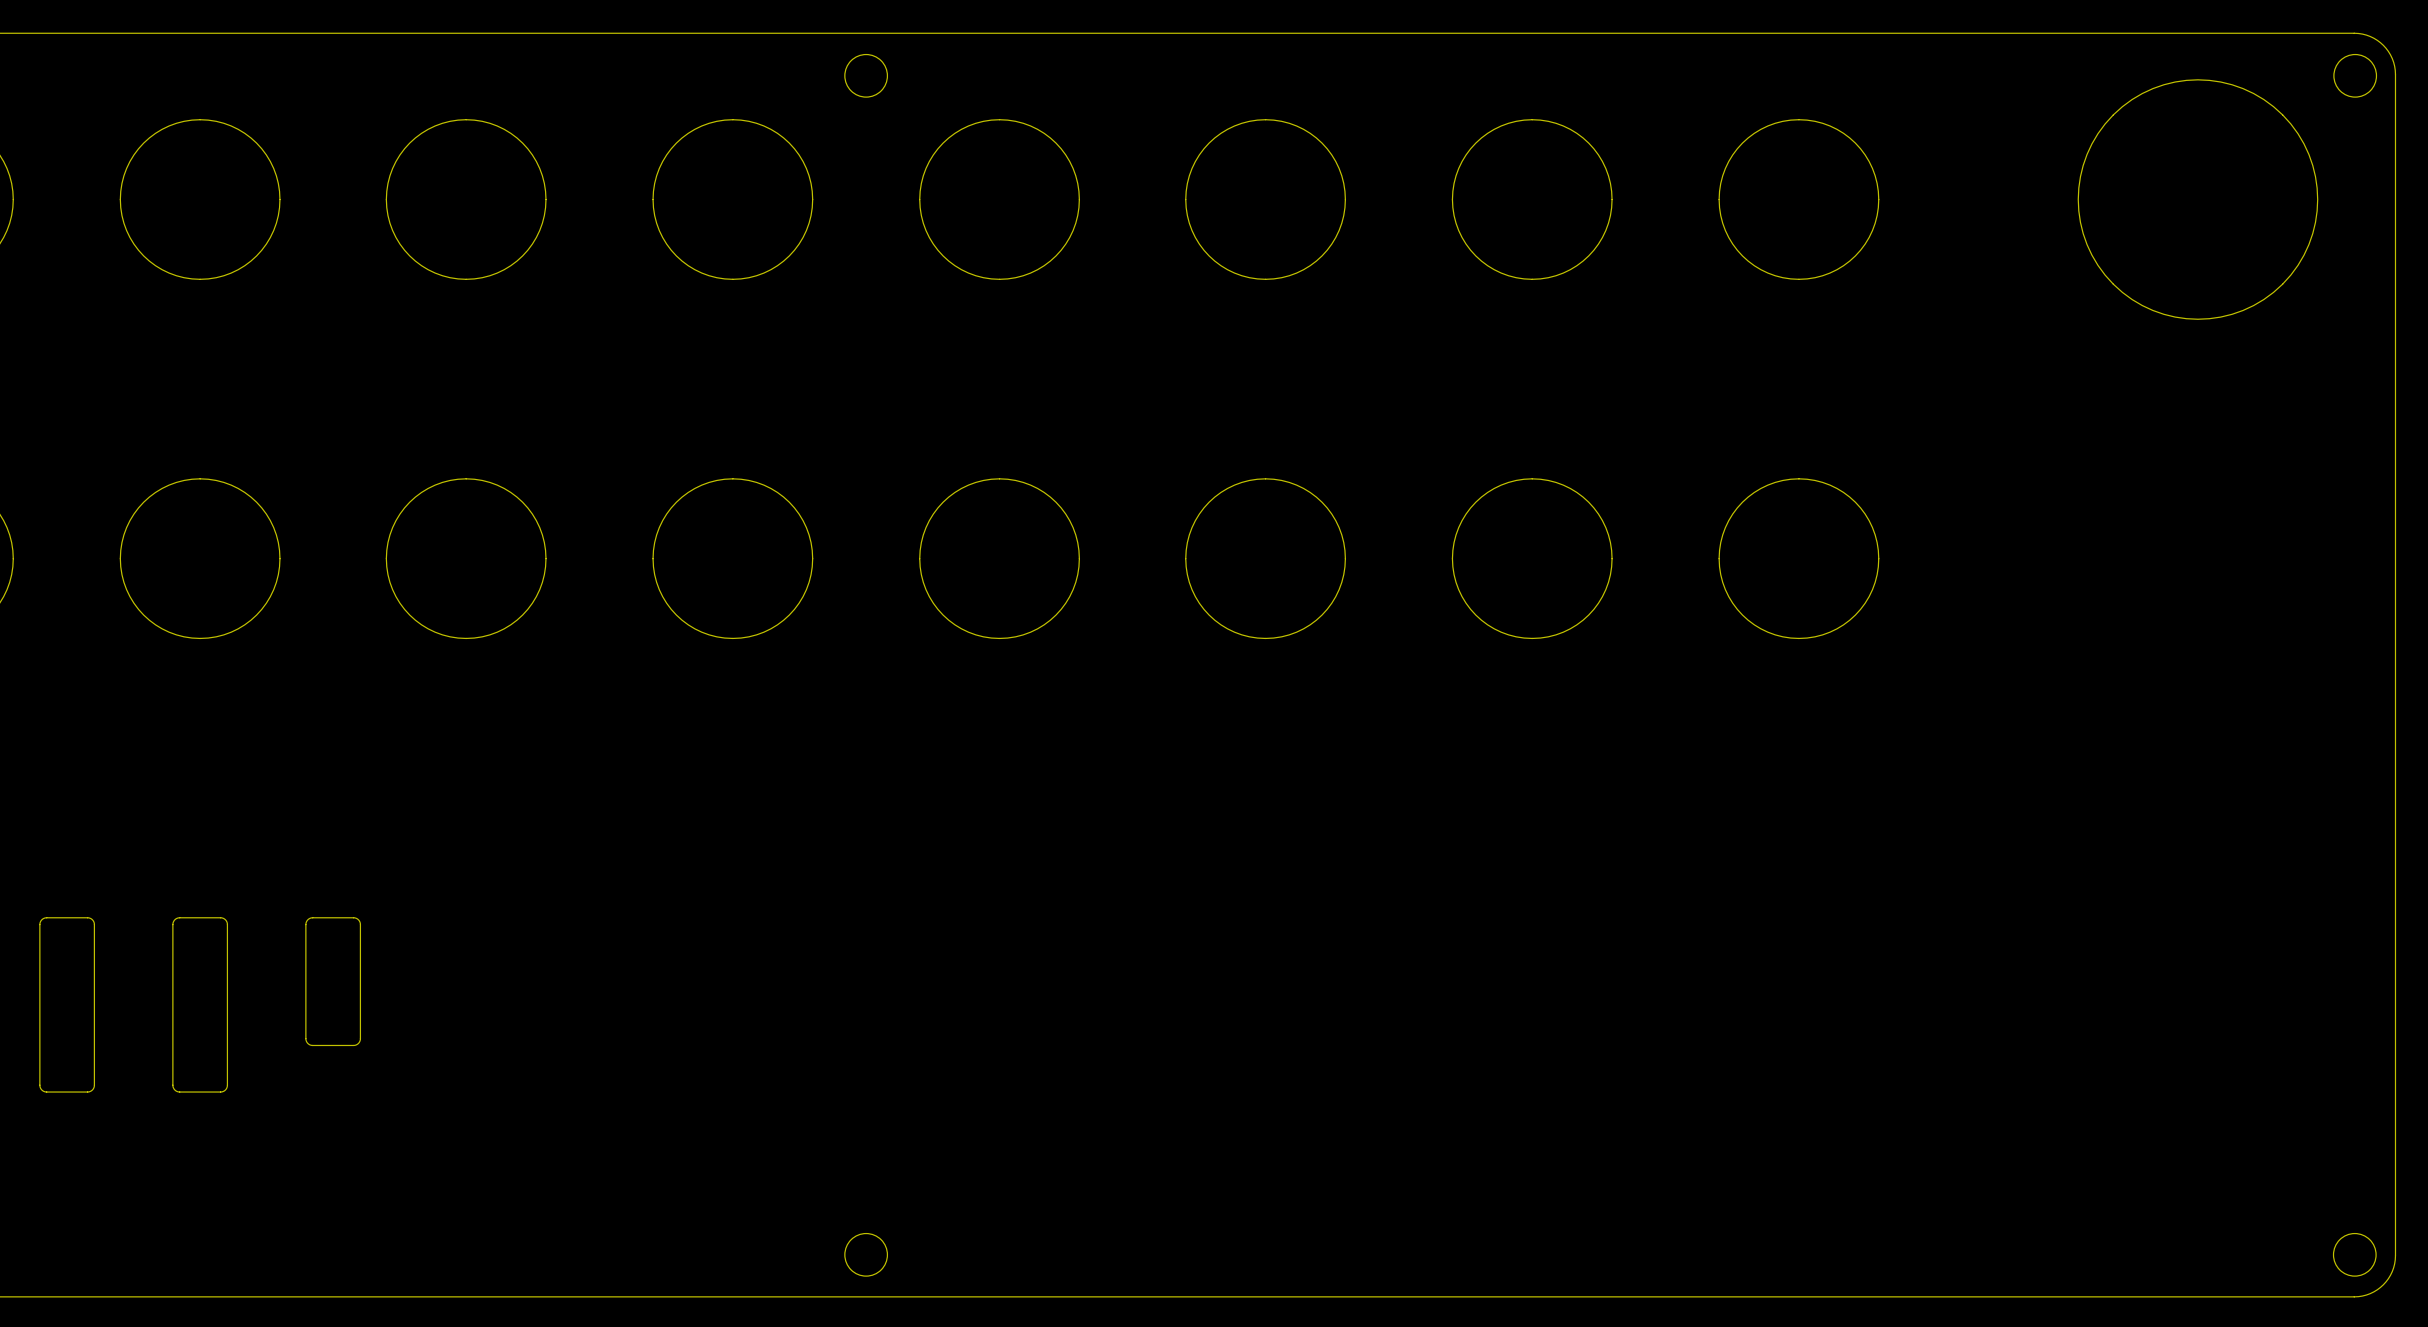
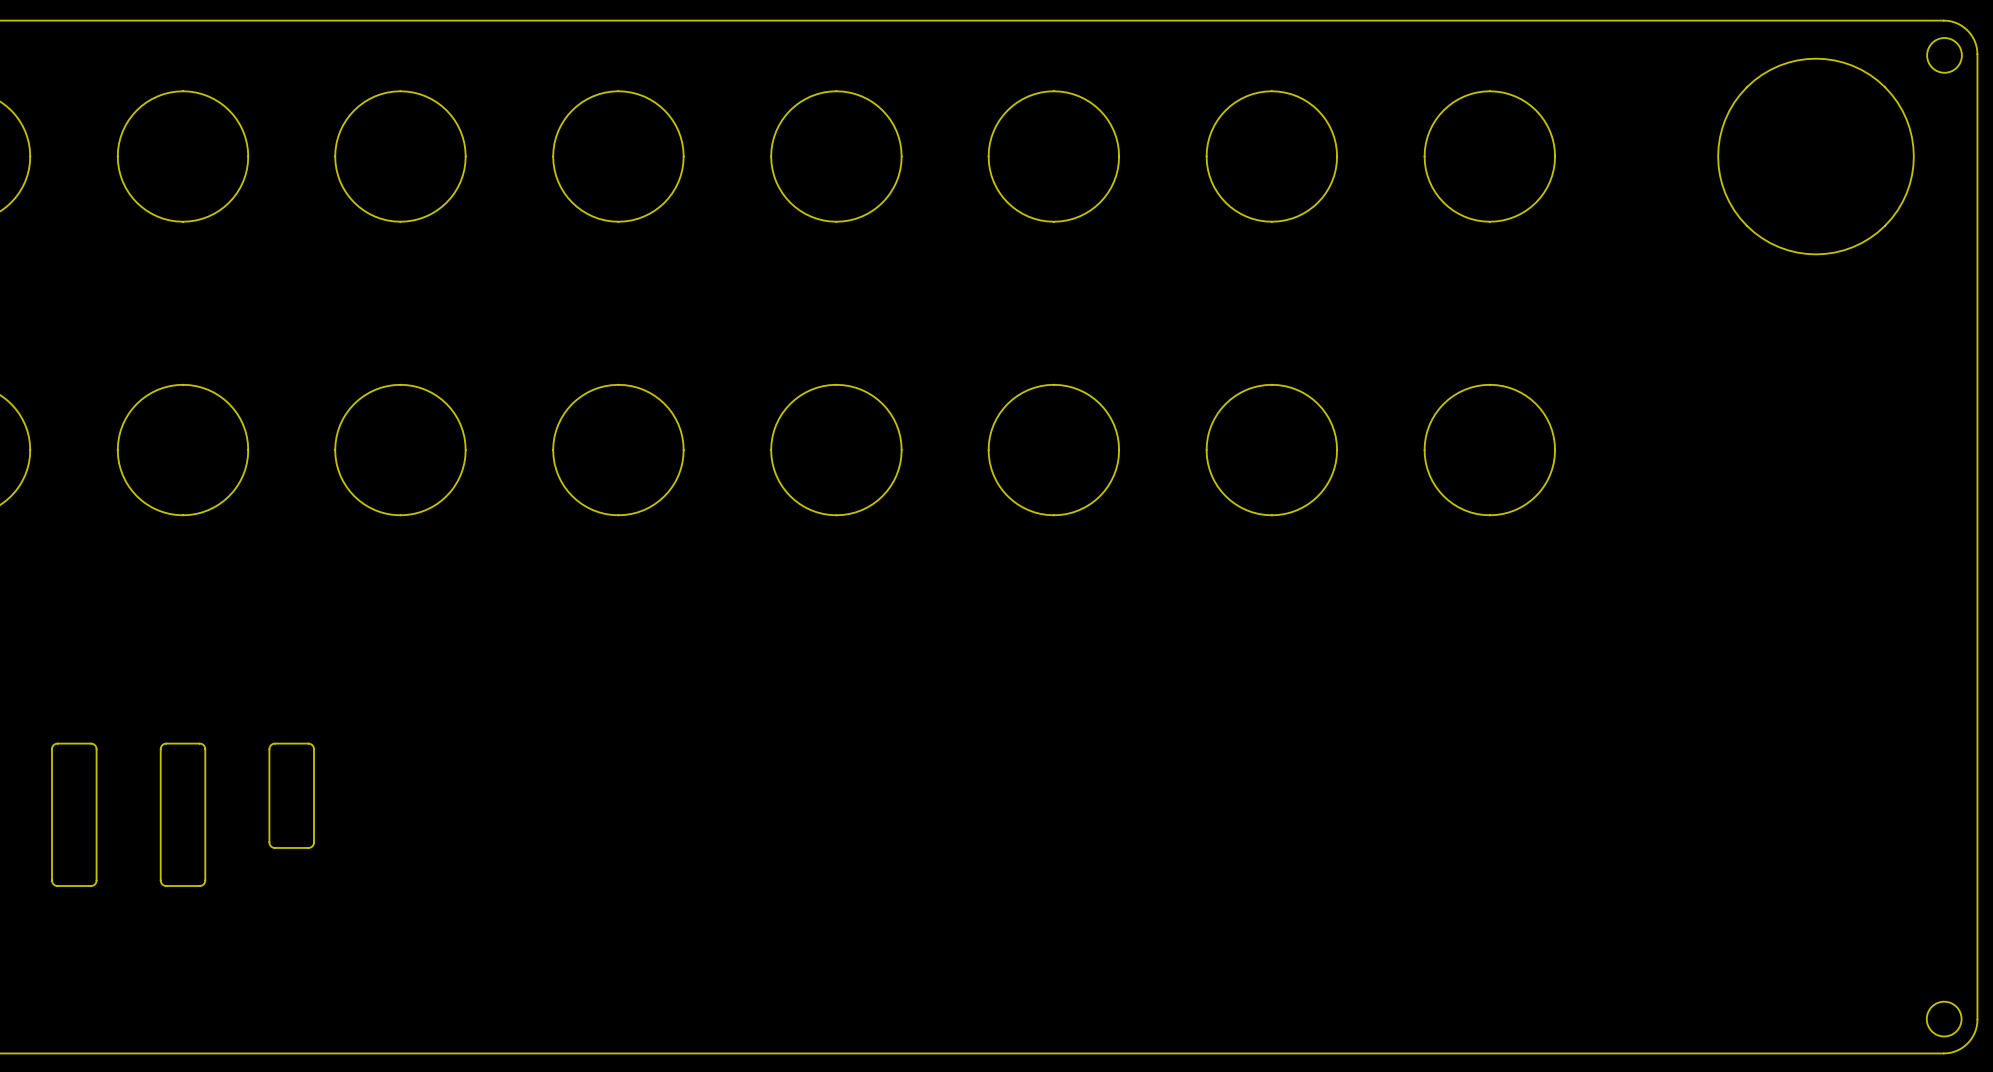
round board edge: [844, 54, 888, 98] -> none
round board edge: [844, 1233, 888, 1277] -> none

